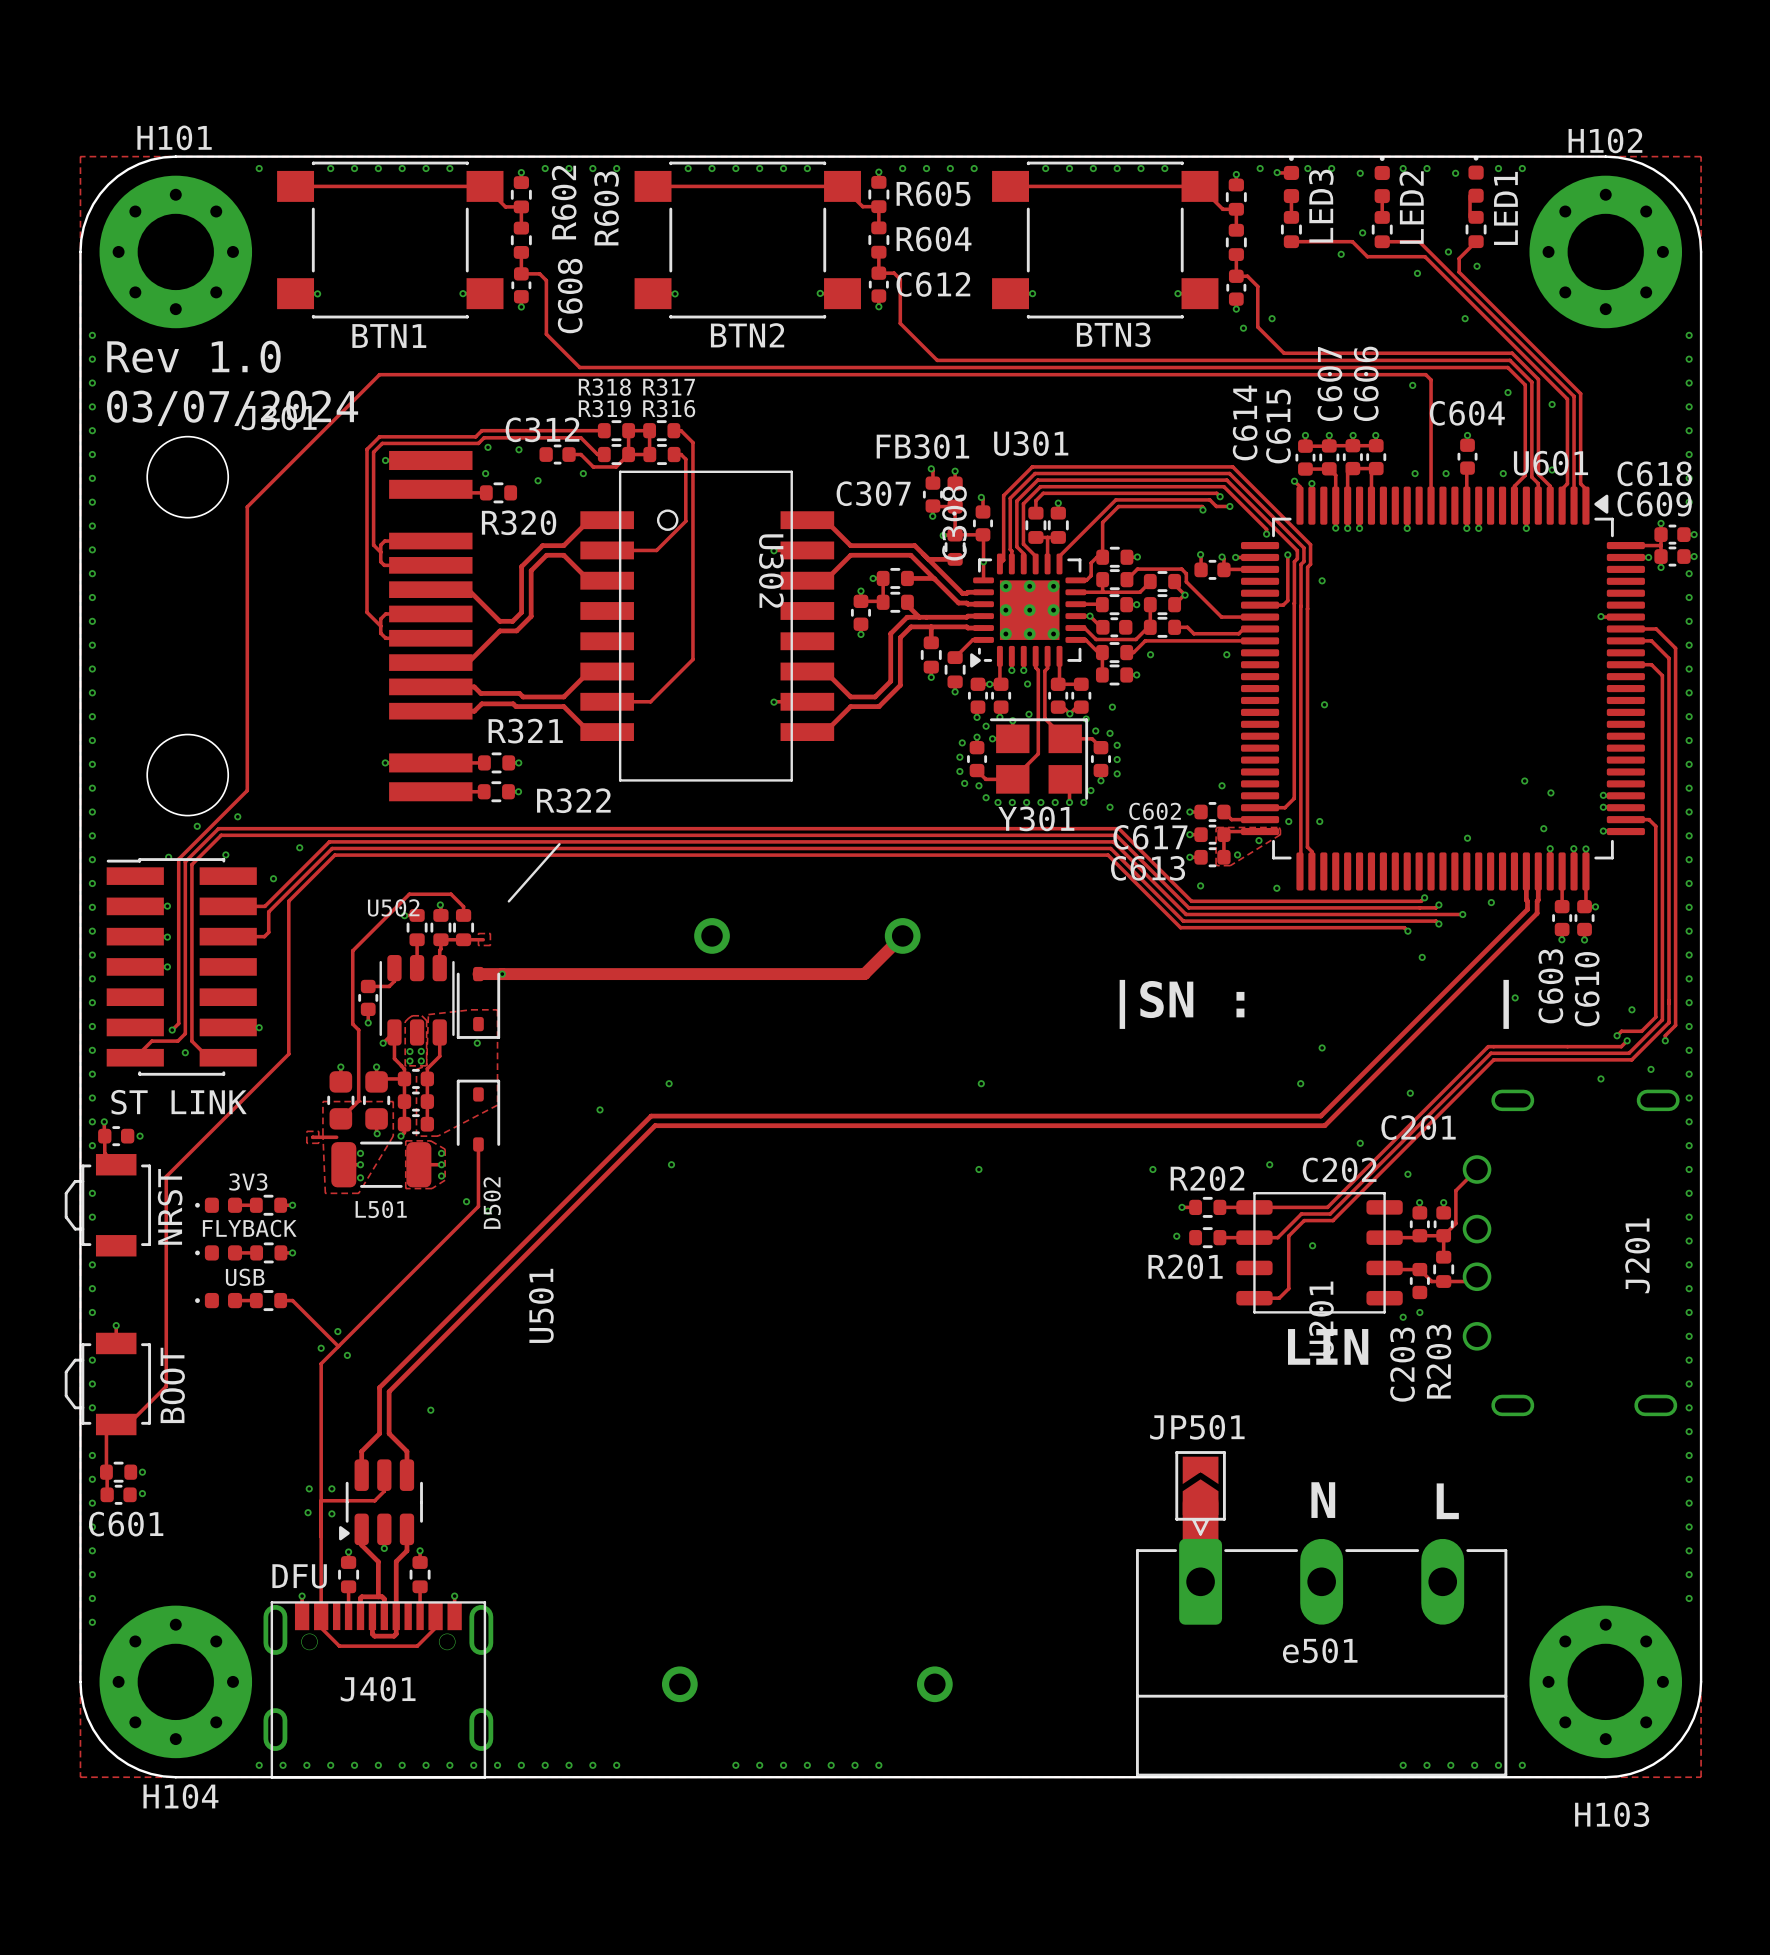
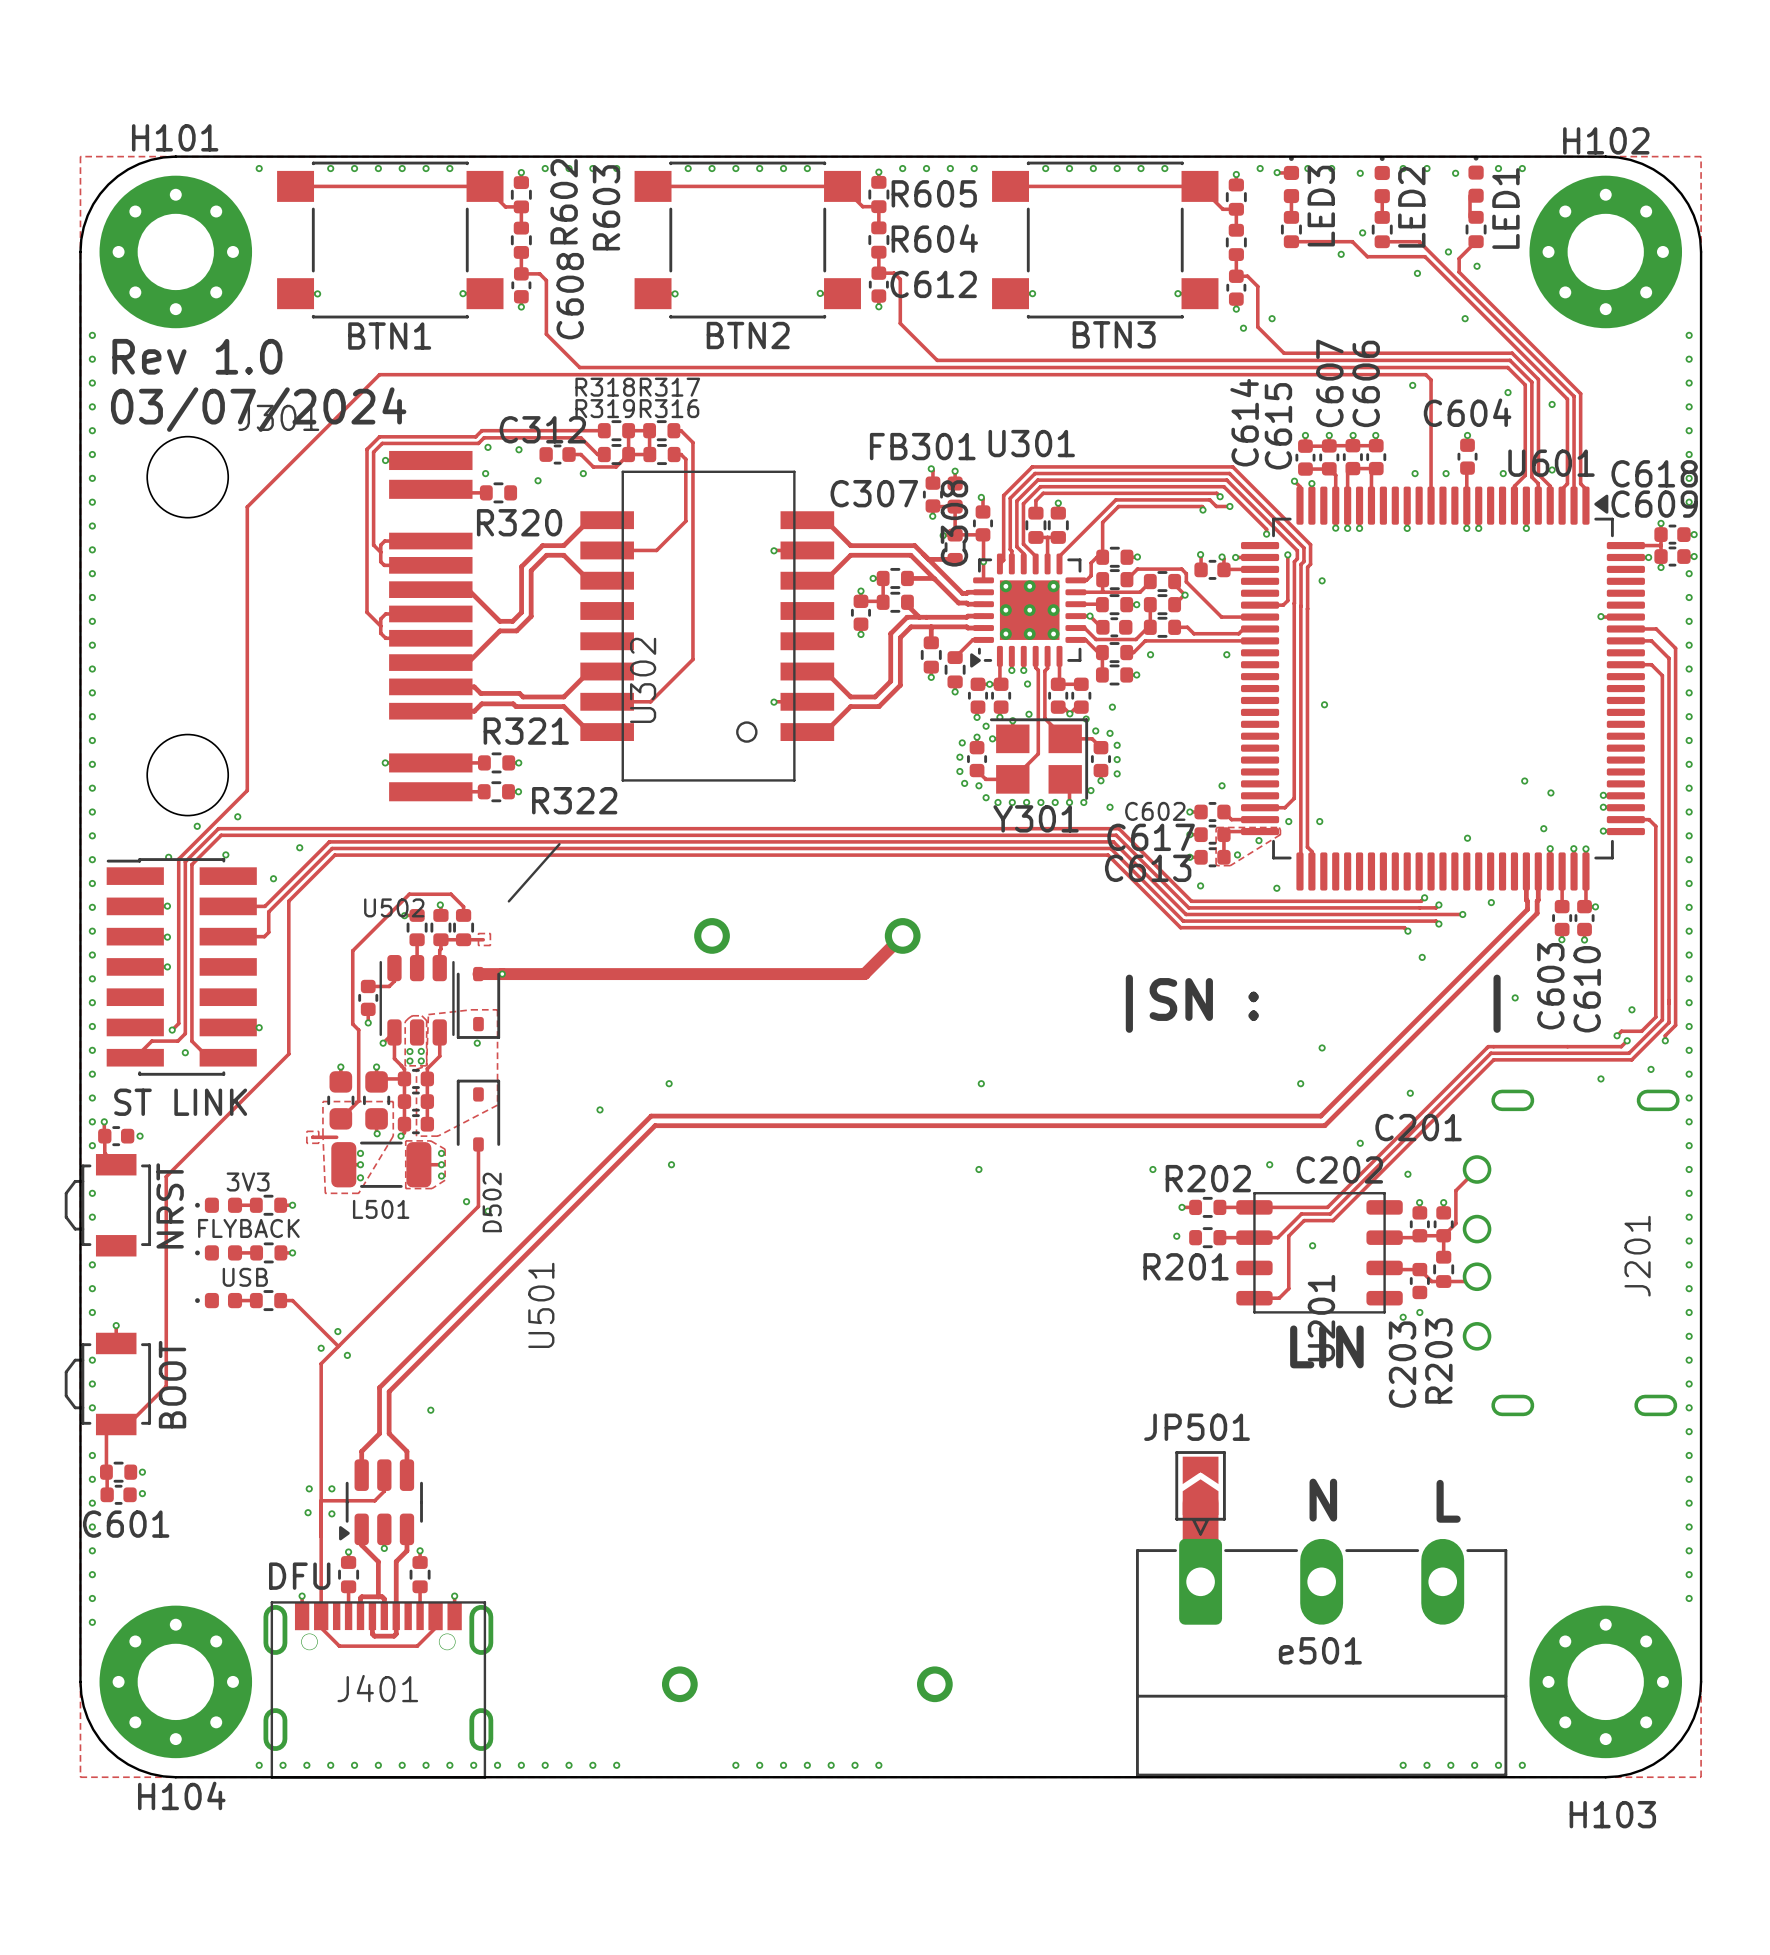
U302 rotation: 0° (707, 626) -> 180° (707, 626)

